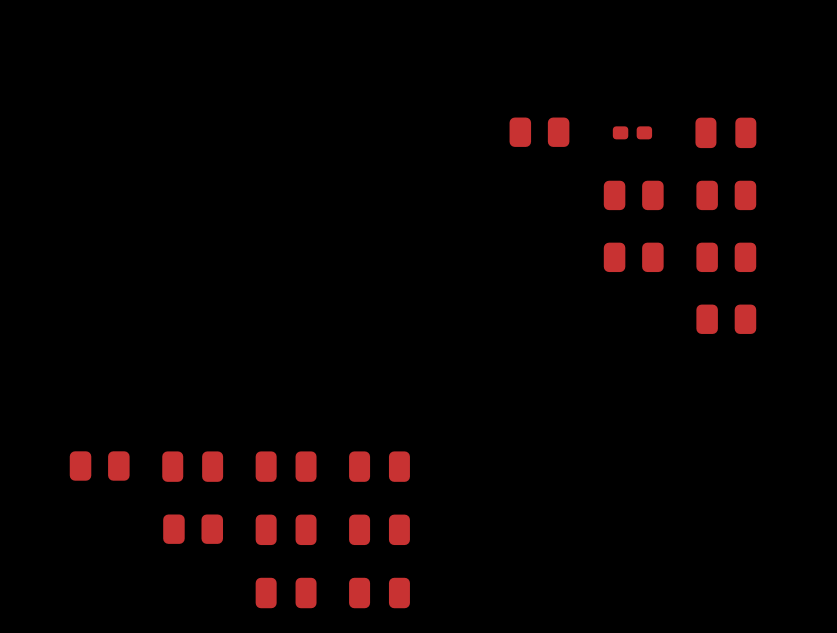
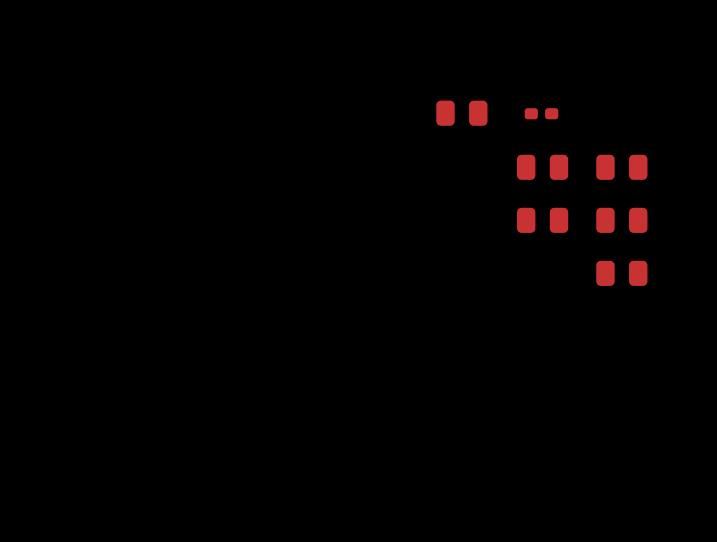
part: (725, 132) -> none
part: (99, 466) -> none
part: (192, 466) -> none
part: (286, 466) -> none
part: (379, 466) -> none
part: (193, 529) -> none
part: (286, 529) -> none
part: (379, 529) -> none
part: (286, 593) -> none
part: (379, 593) -> none

